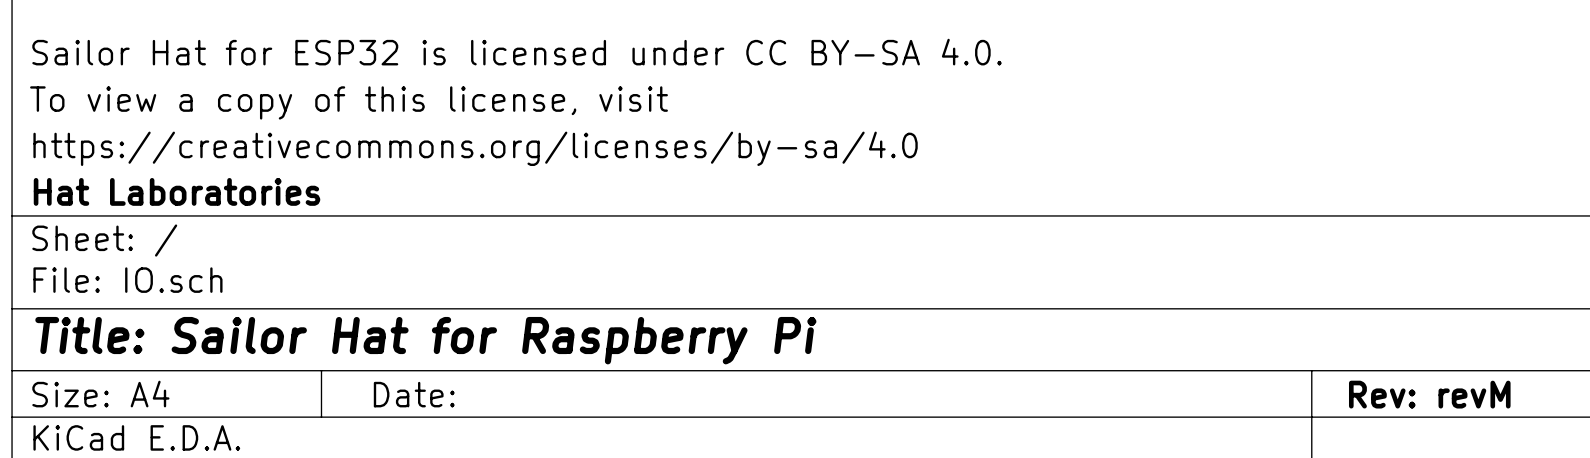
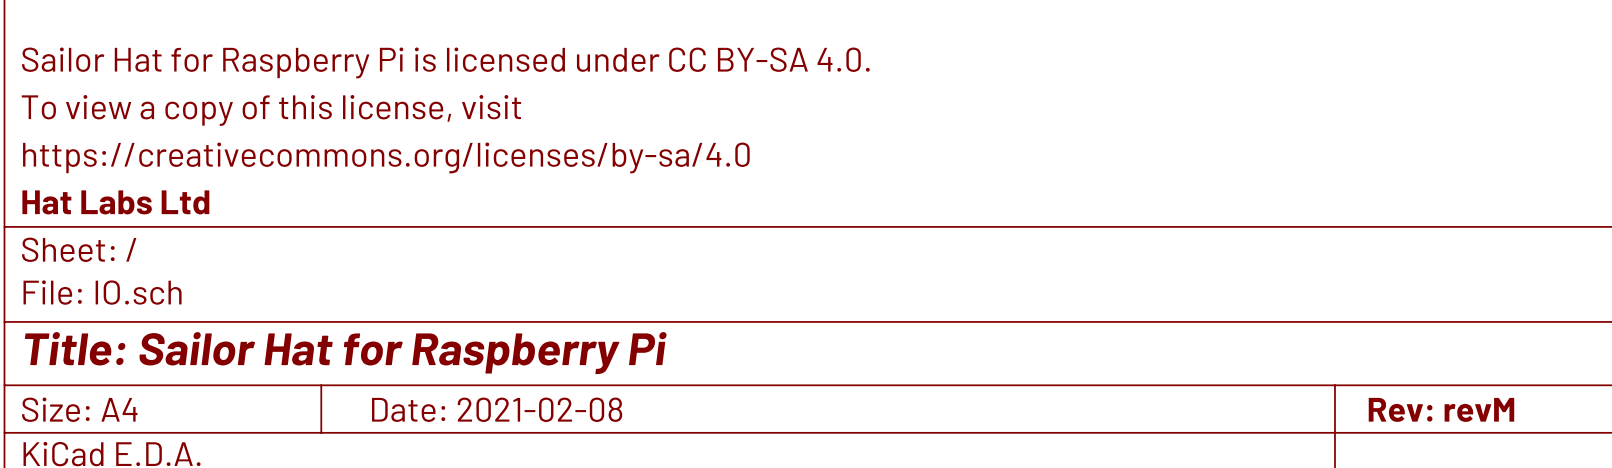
title block: Sailor Hat for ESP32 is licensed under CC BY-SA 4.0. (517, 52) -> Sailor Hat for Raspberry Pi is licensed under CC BY-SA 4.0. (445, 62)
title block: Hat Laboratories (176, 191) -> Hat Labs Ltd (115, 202)
title block: Date: (414, 394) -> Date: 2021-02-08 (497, 409)

